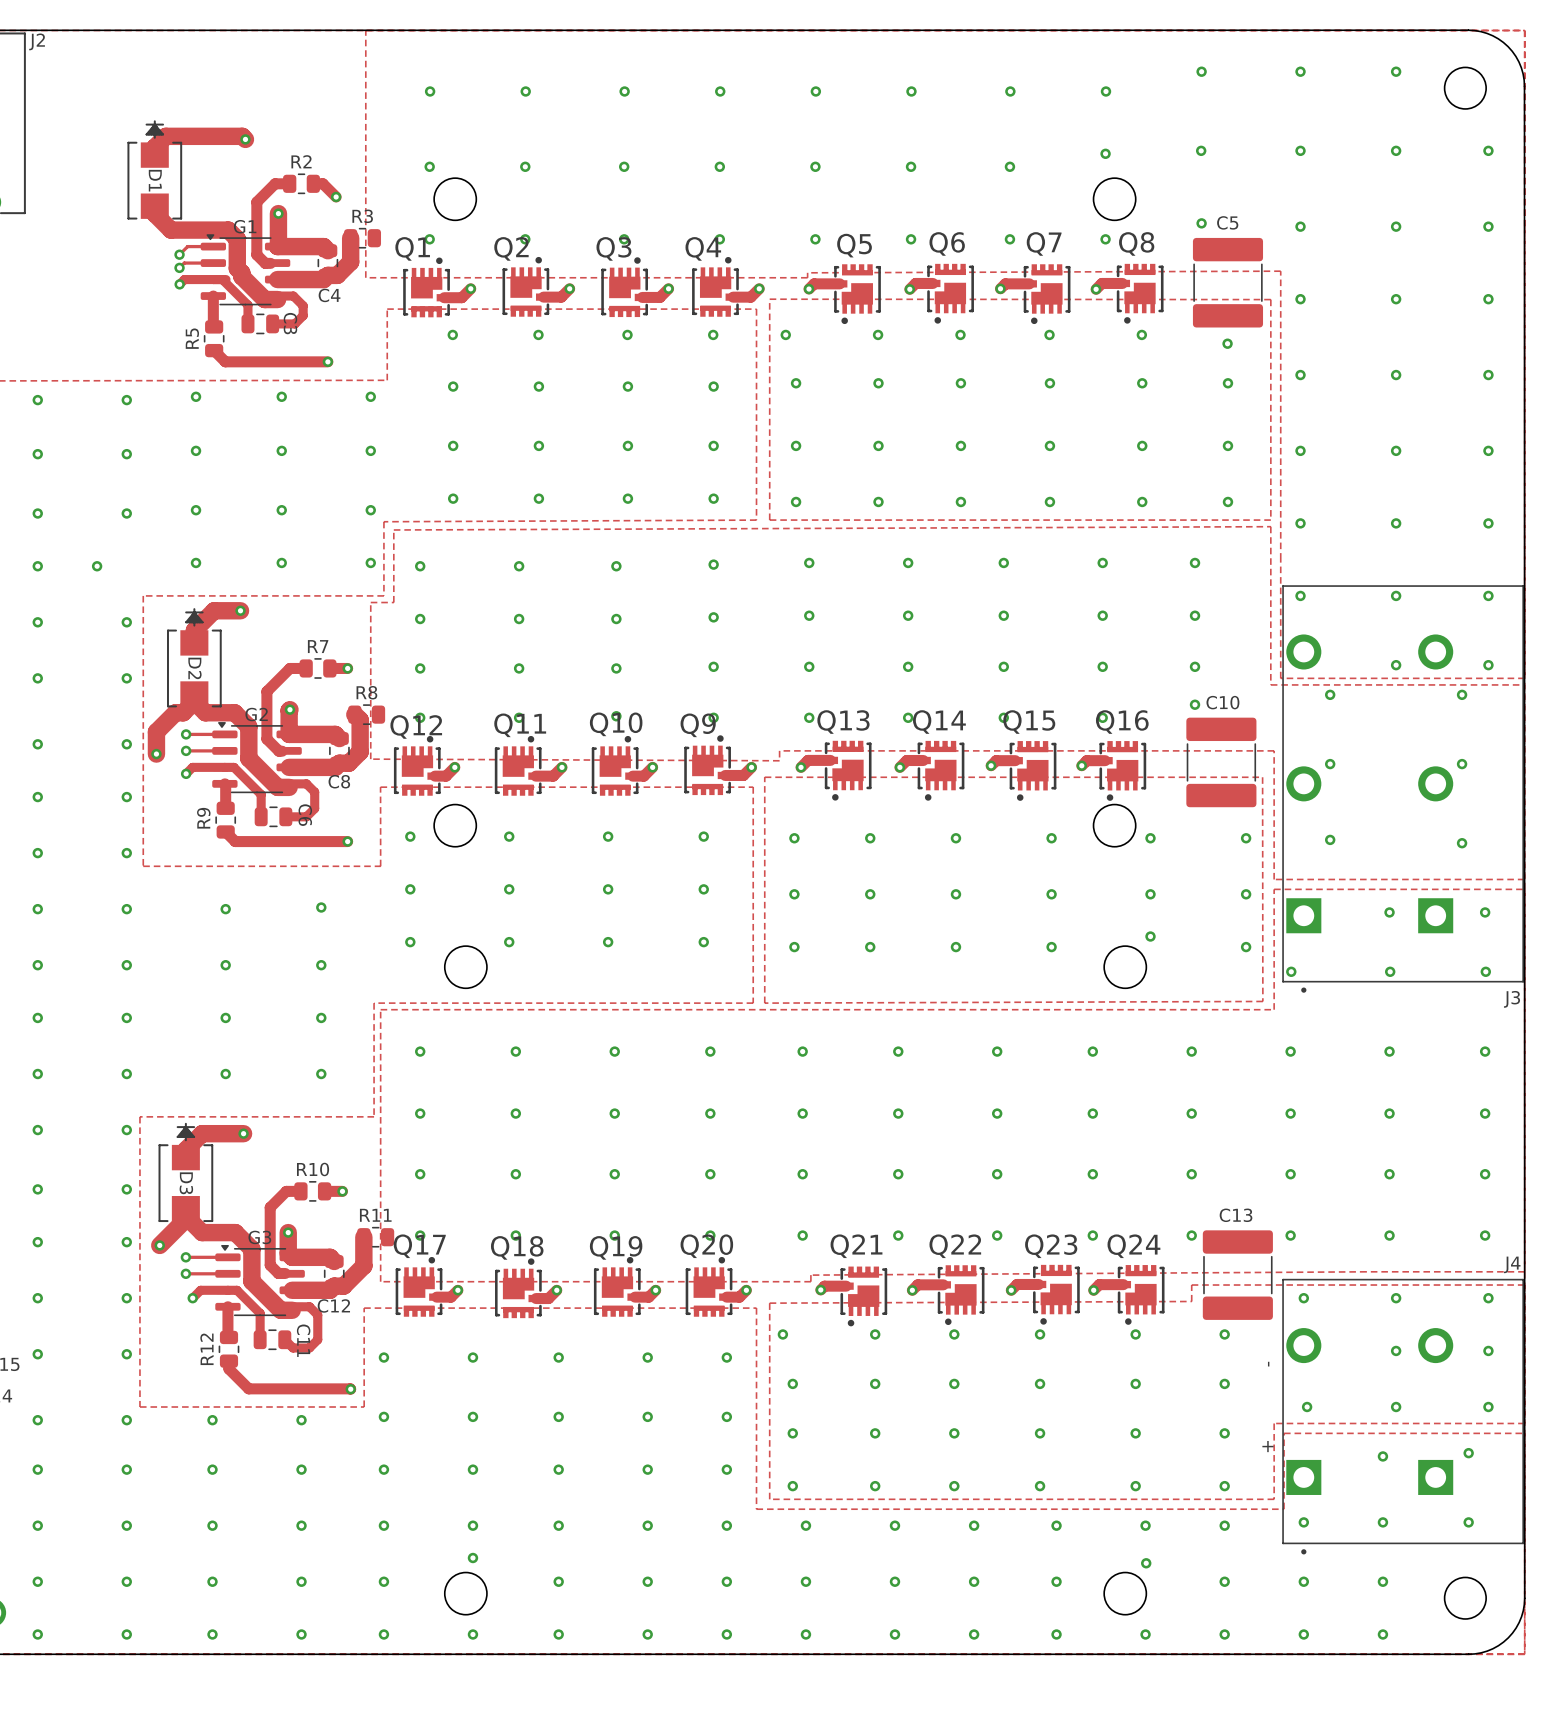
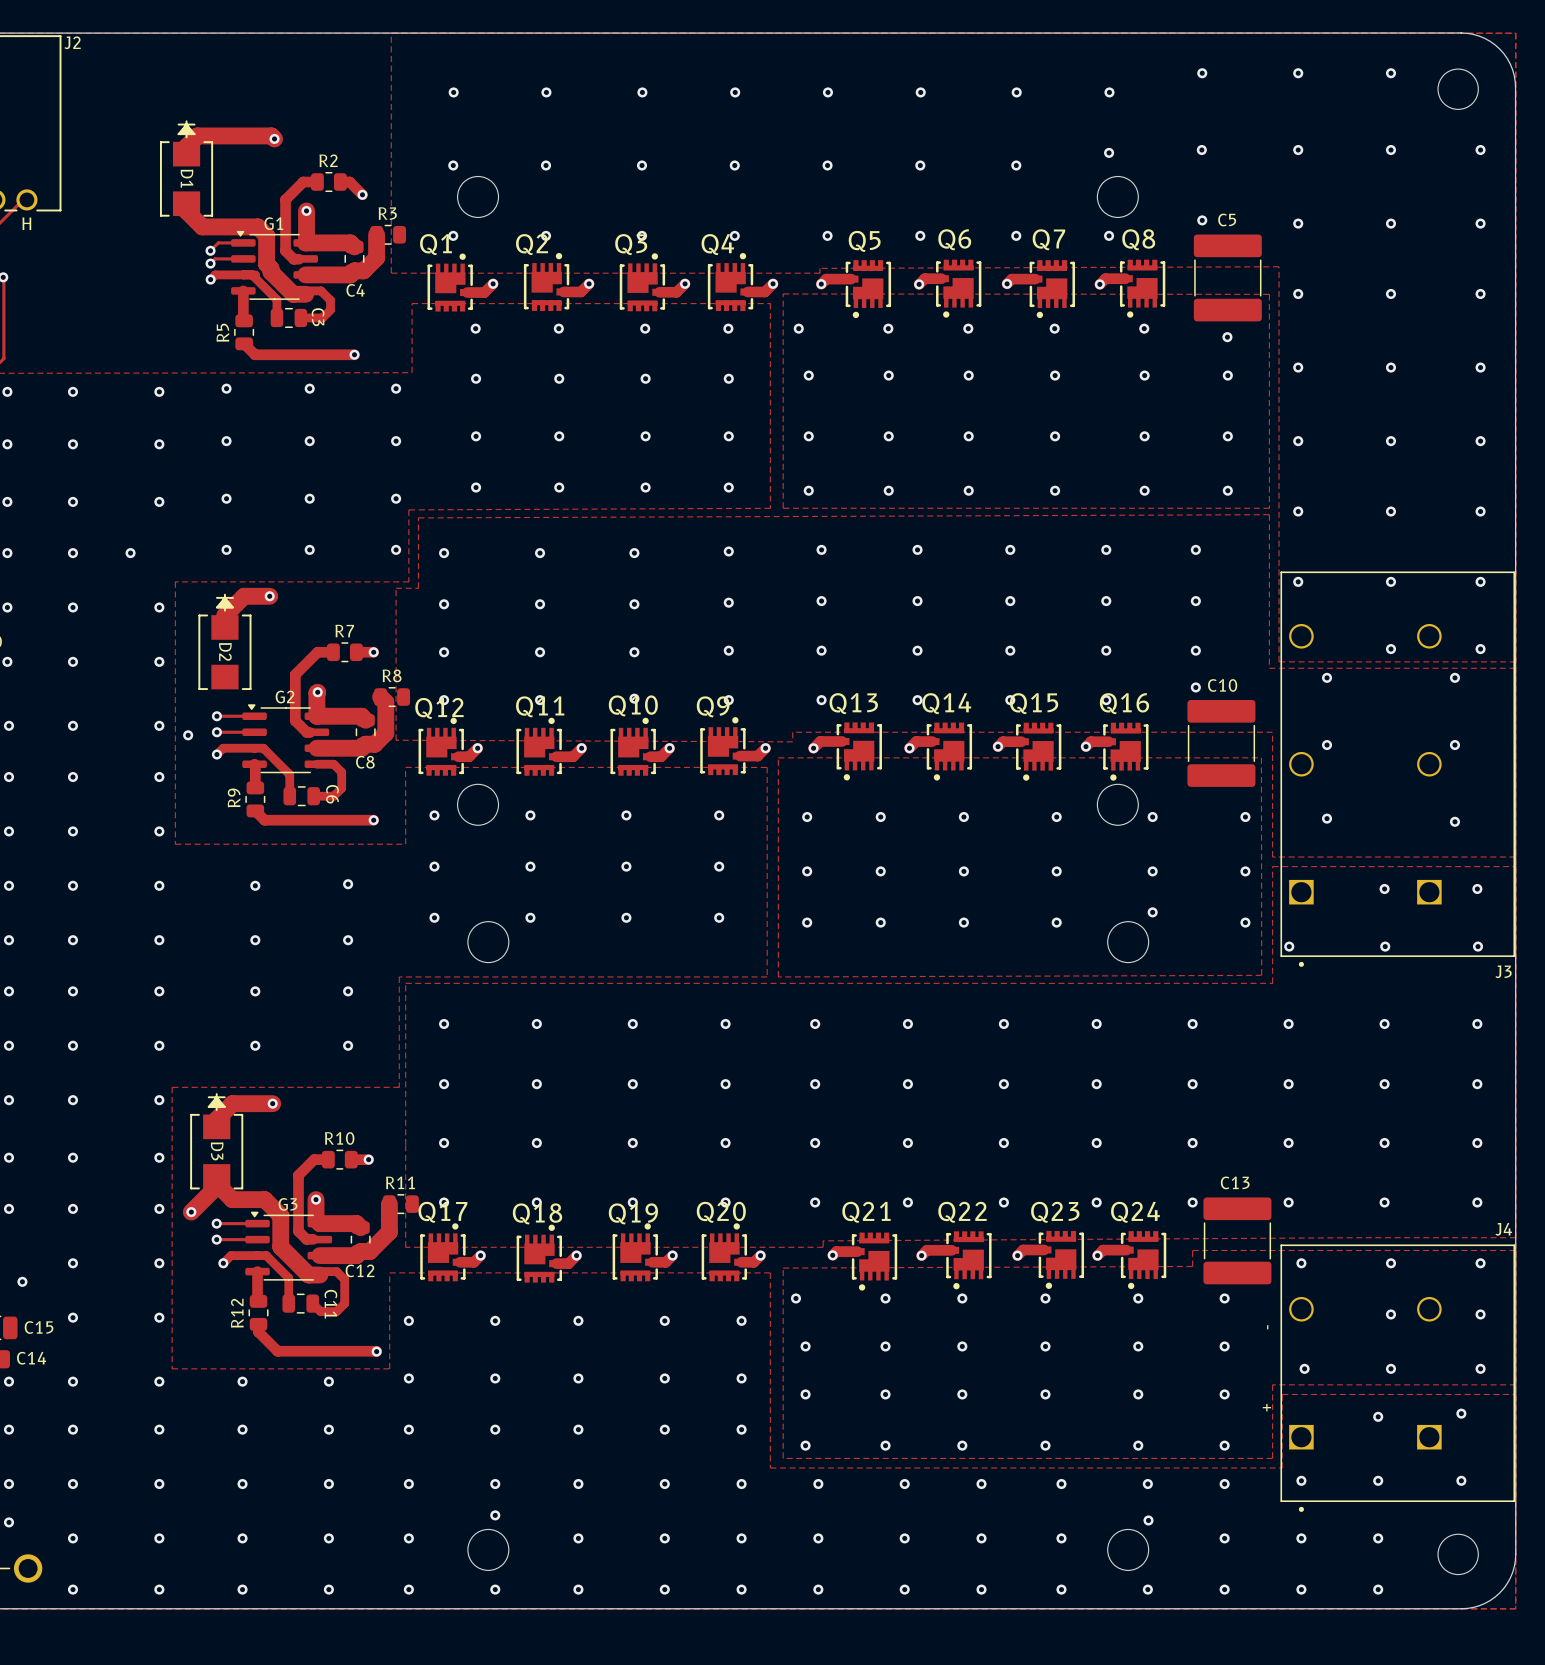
J3 footprint: [1282, 585, 1525, 993] -> [1280, 571, 1516, 967]
track: (194, 701) (183, 712) (175, 712) (156, 731) (156, 754) -> none
track: (194, 701) (205, 712) (234, 712) (248, 726) (248, 758) (277, 787) (289, 787) -> none
J4 footprint: [1282, 1278, 1525, 1555] -> [1280, 1244, 1516, 1512]

